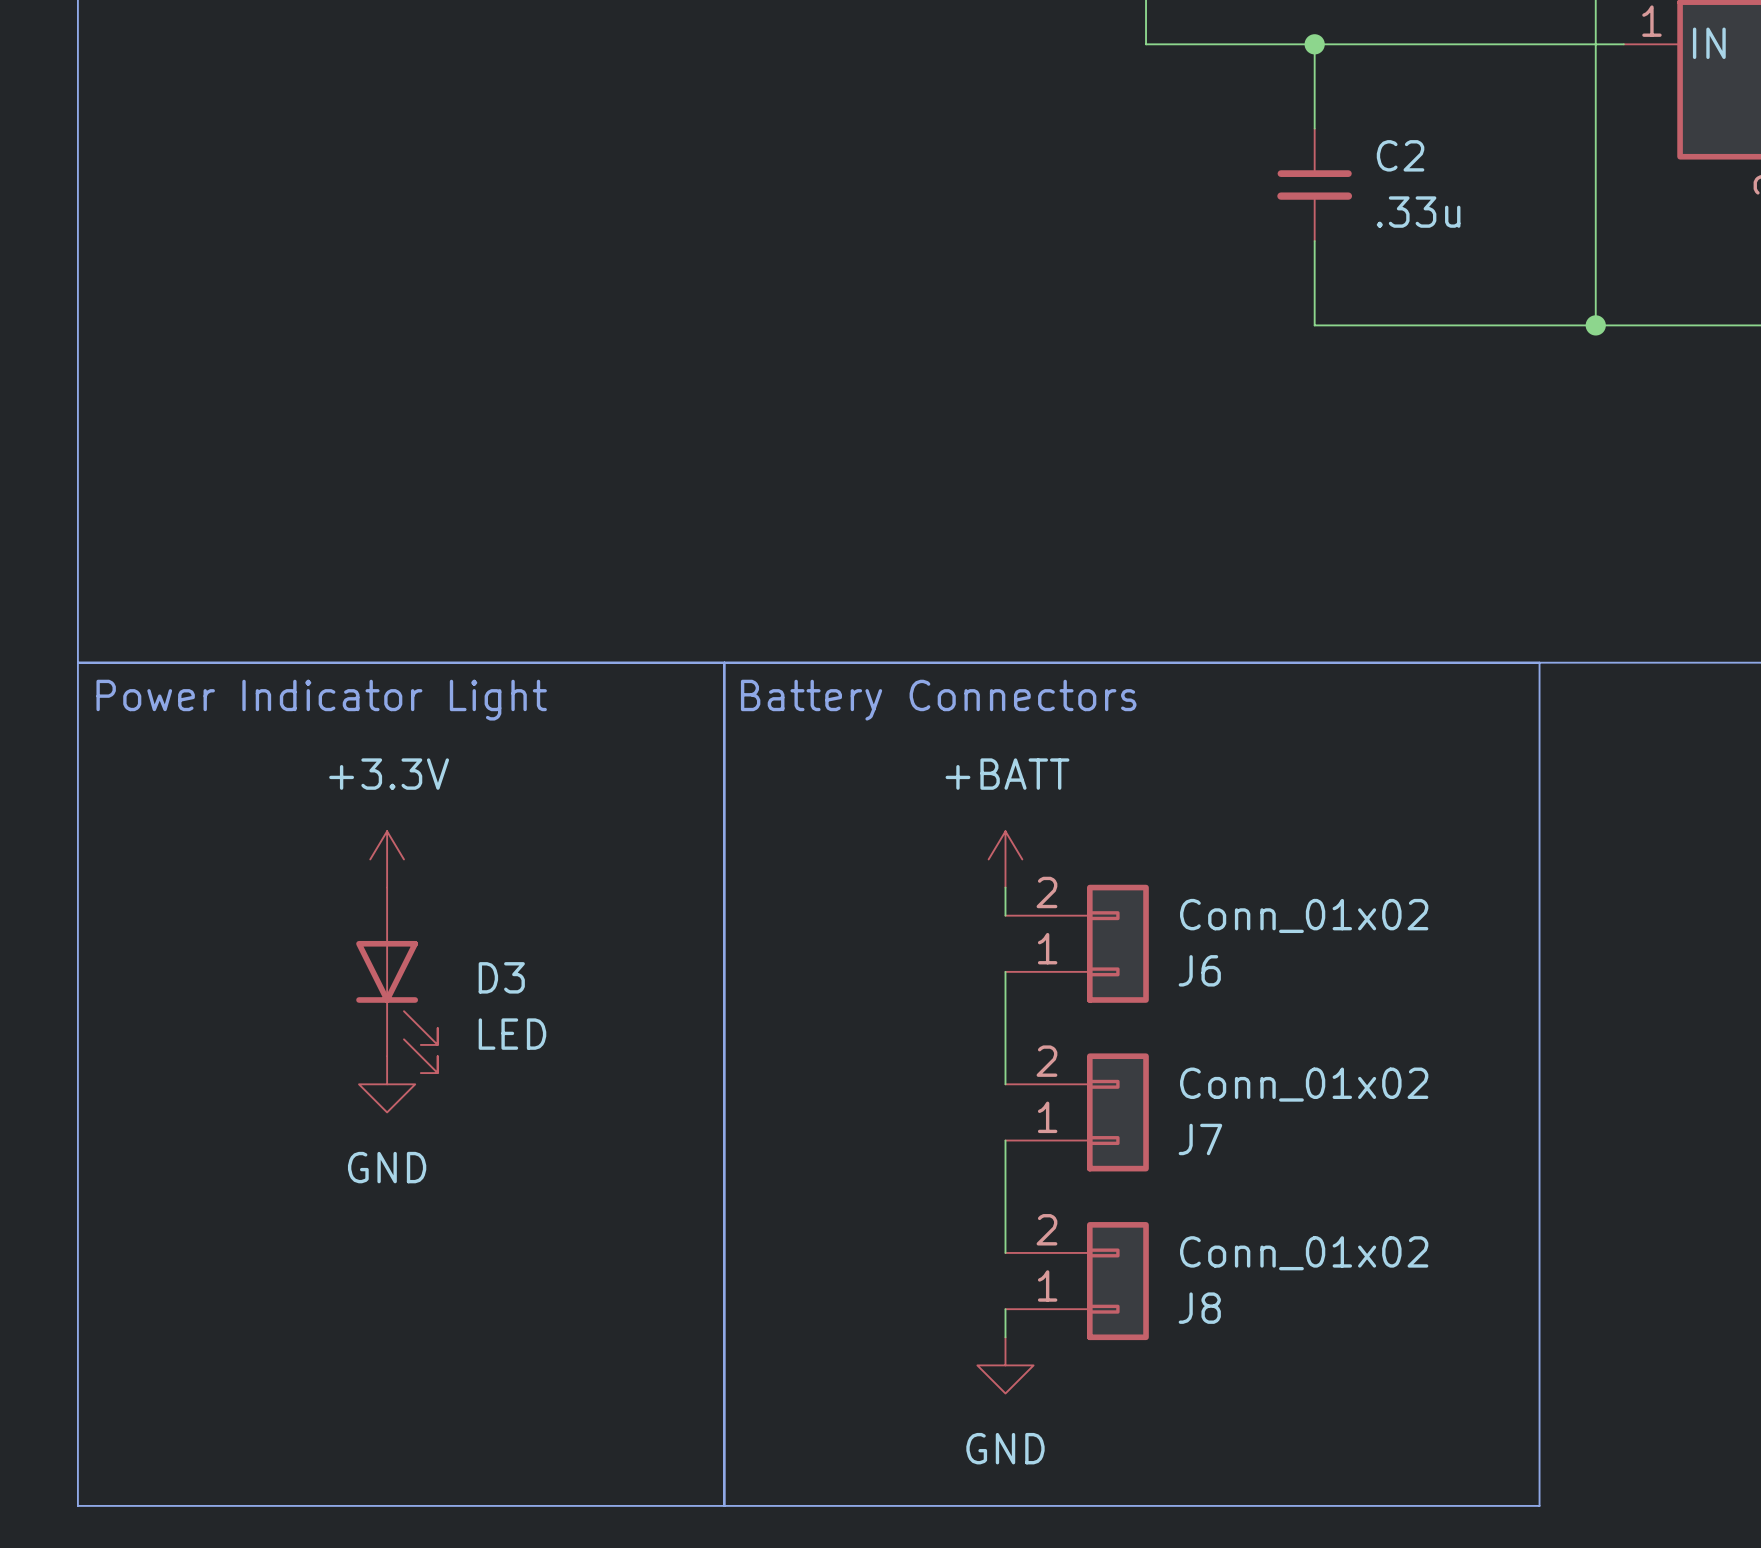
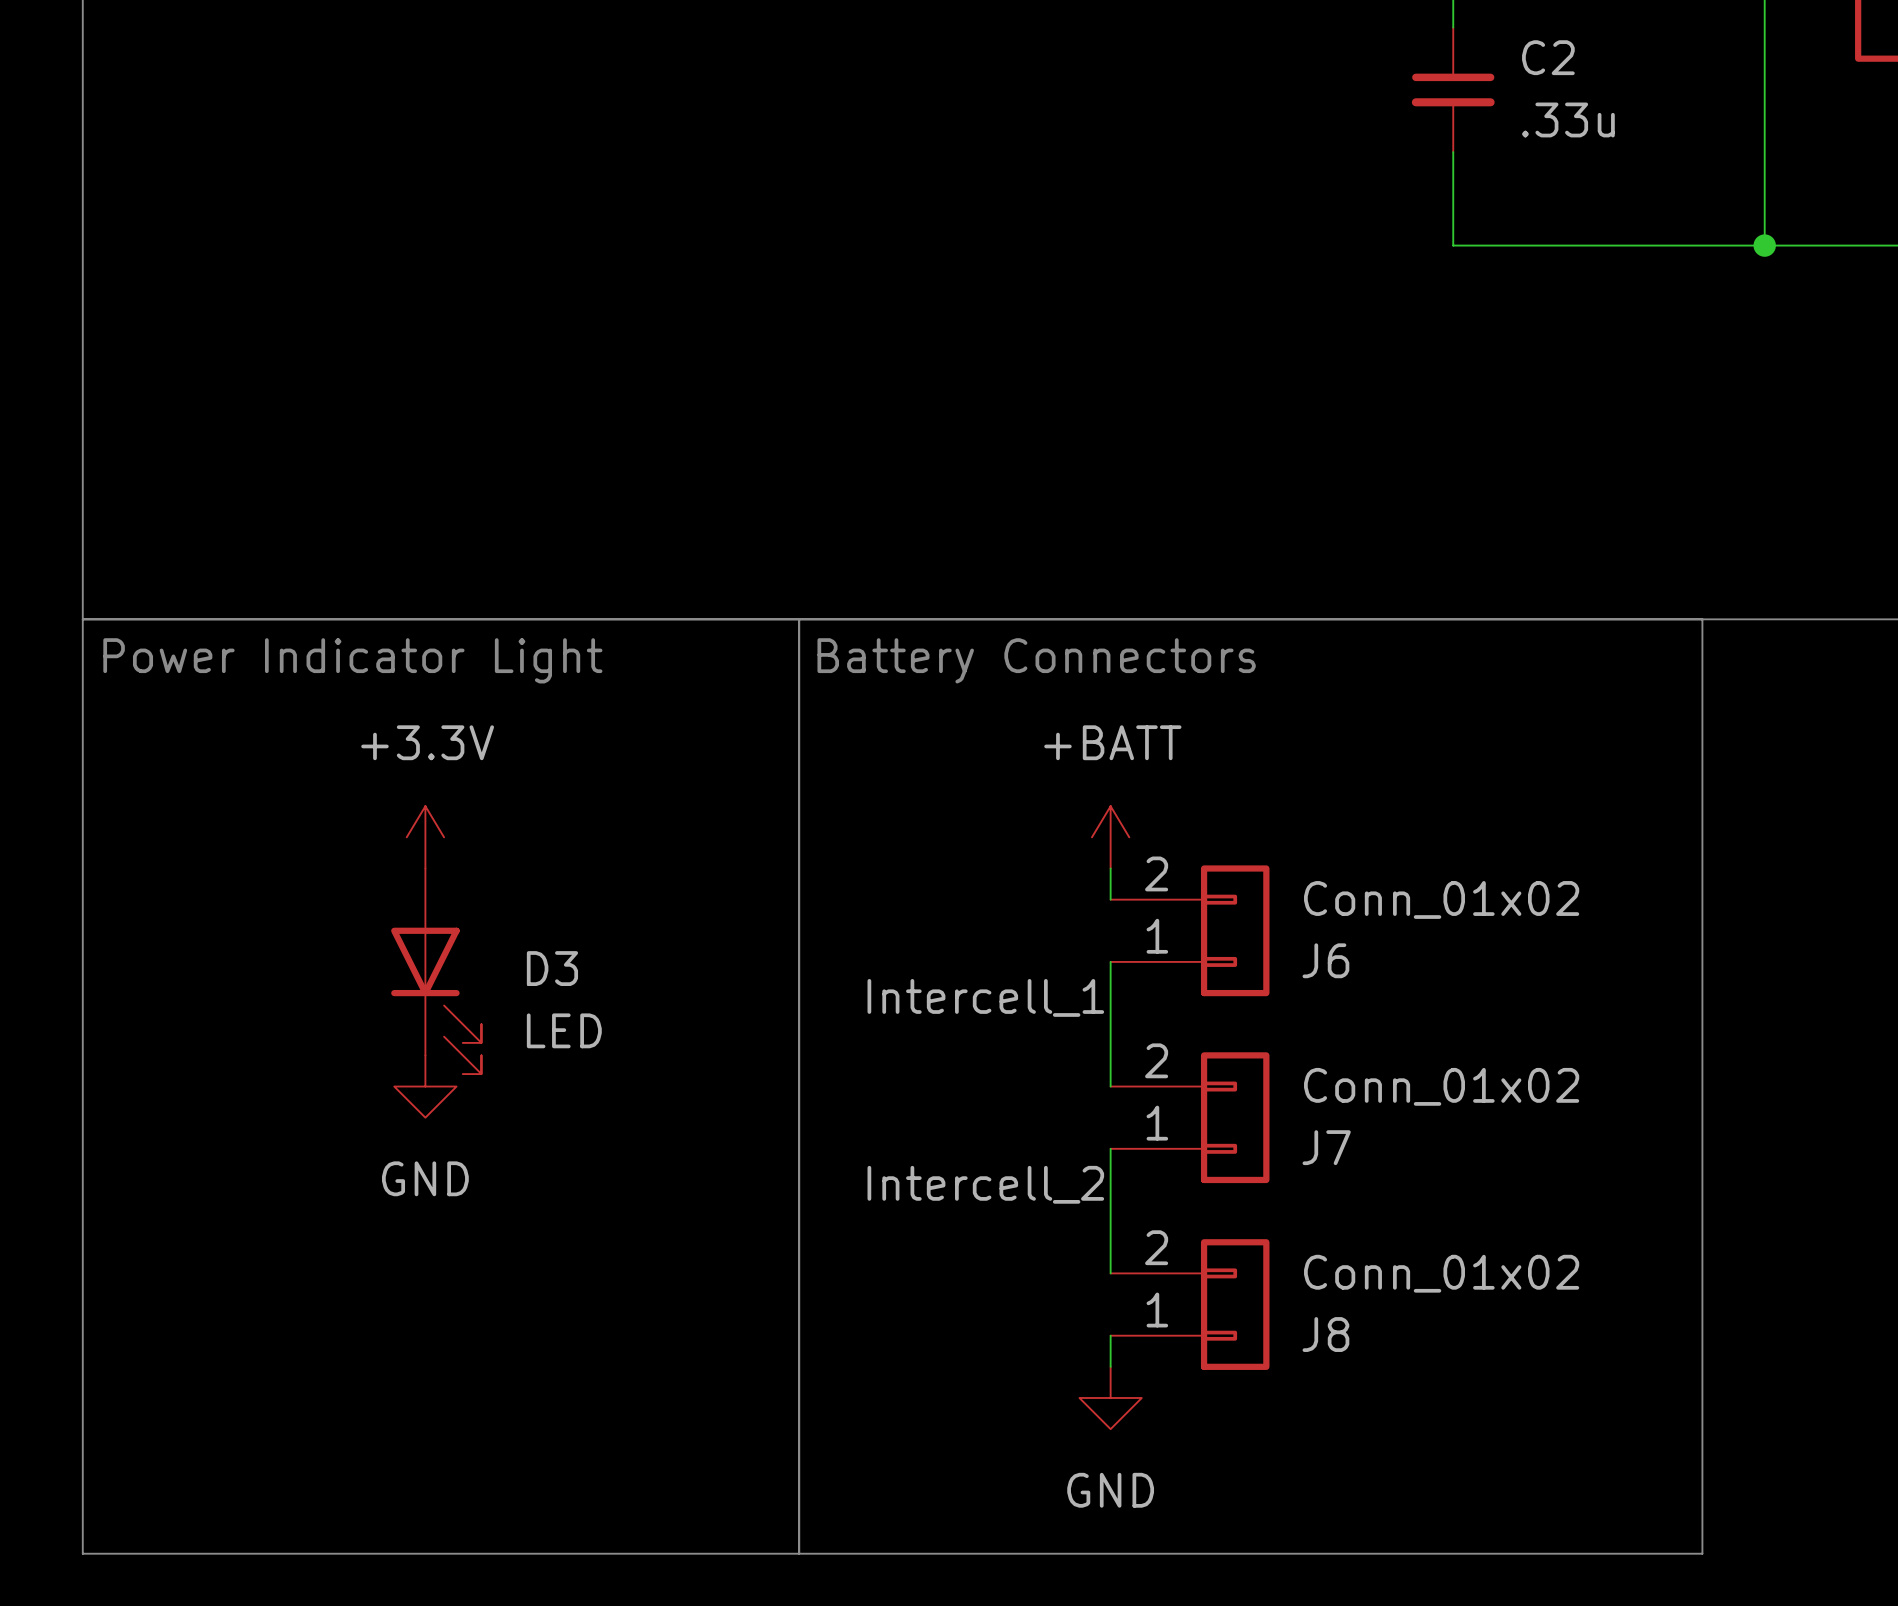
label: none -> Intercell_1 (985, 997)
label: none -> Intercell_2 (985, 1184)

